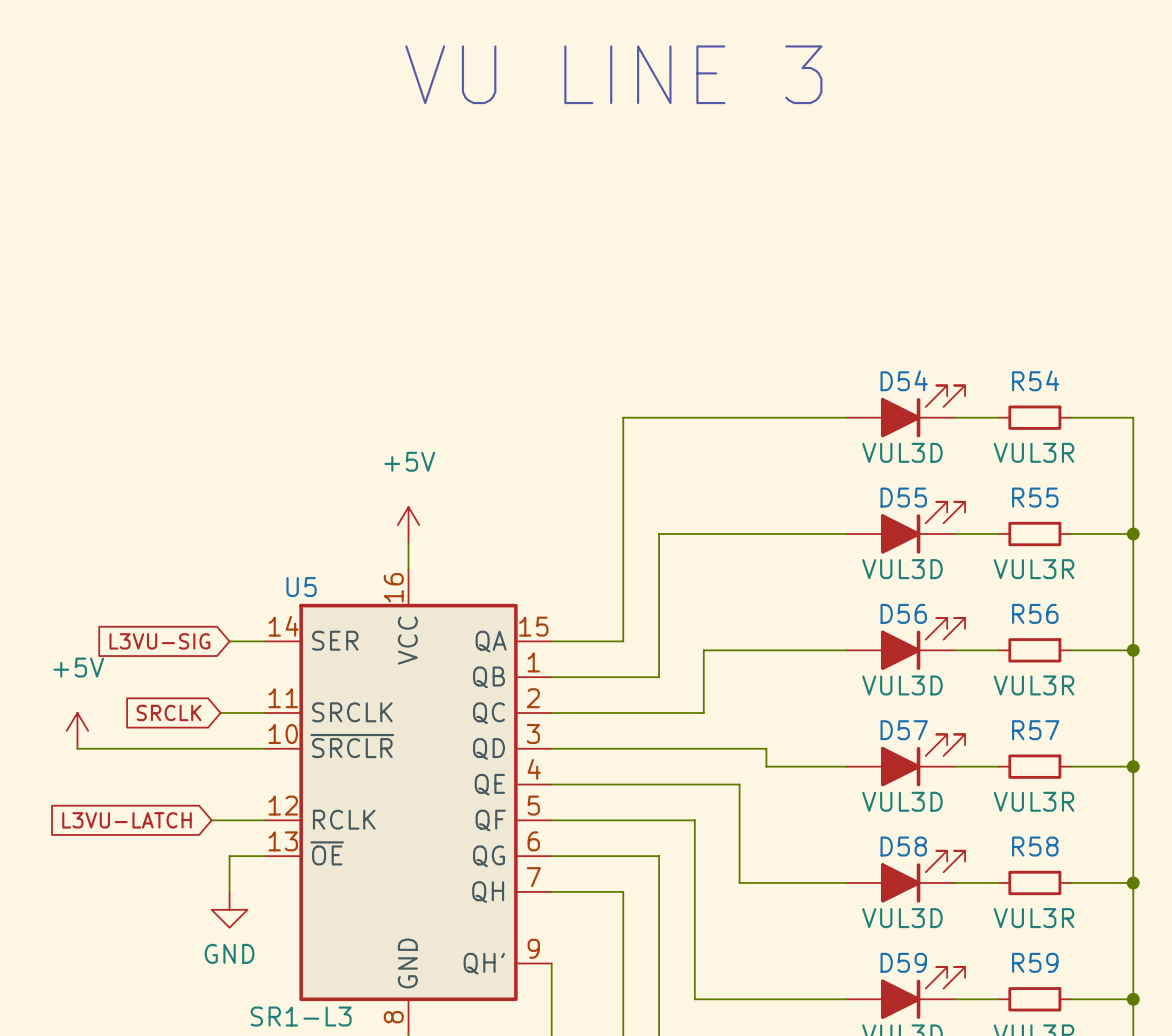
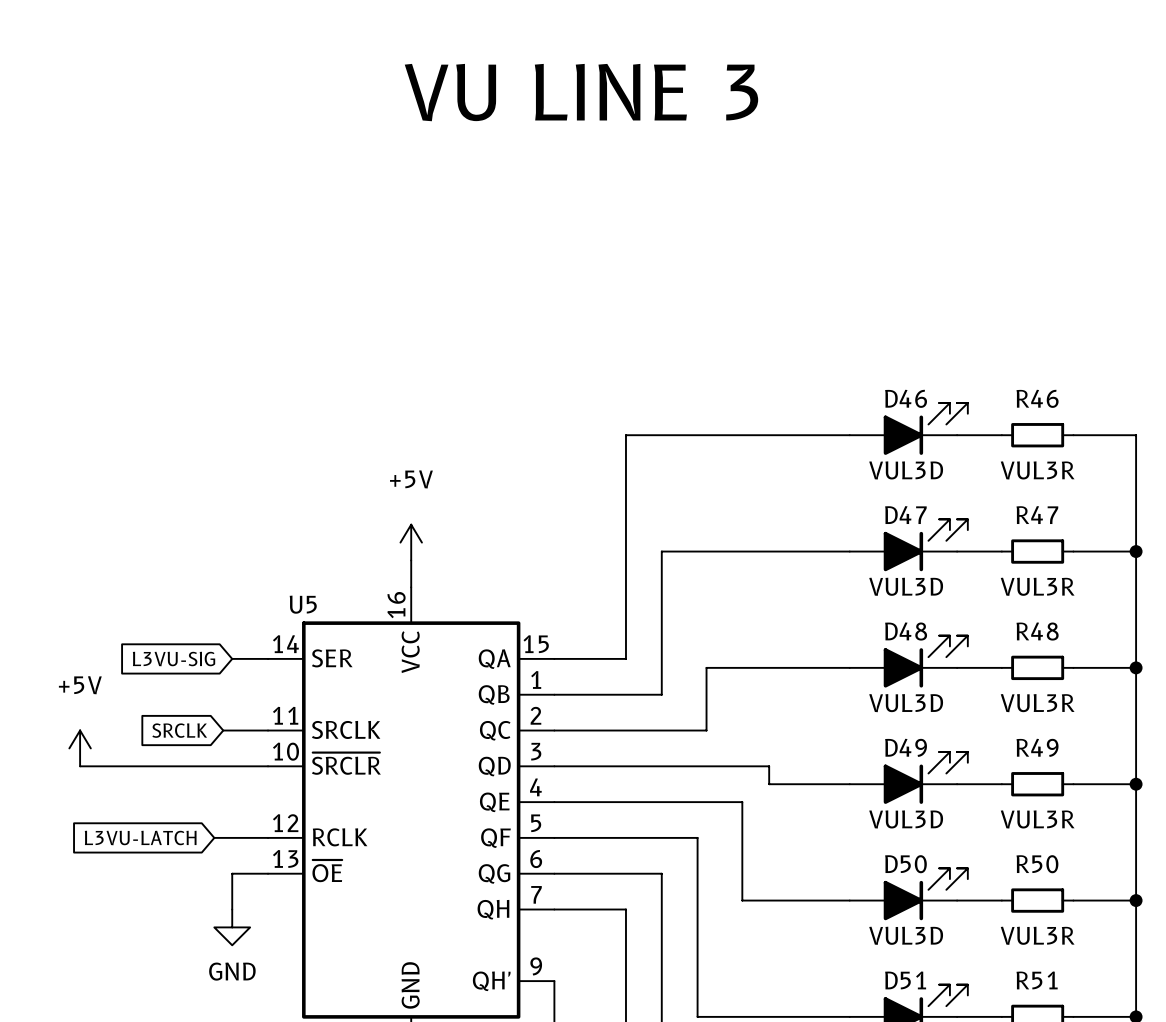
D54 name: D54 (904, 380) -> D46 (906, 398)
R54 name: R54 (1035, 380) -> R46 (1037, 398)
D55 name: D55 (903, 497) -> D47 (905, 515)
R55 name: R55 (1035, 497) -> R47 (1037, 515)
D56 name: D56 (903, 613) -> D48 (906, 631)
R56 name: R56 (1035, 613) -> R48 (1037, 631)
D57 name: D57 (904, 730) -> D49 (906, 747)
R57 name: R57 (1035, 730) -> R49 (1037, 747)
D58 name: D58 (903, 846) -> D50 (905, 864)
R58 name: R58 (1035, 846) -> R50 (1037, 864)
D59 name: D59 (903, 962) -> D51 (905, 980)
R59 name: R59 (1035, 962) -> R51 (1037, 980)

